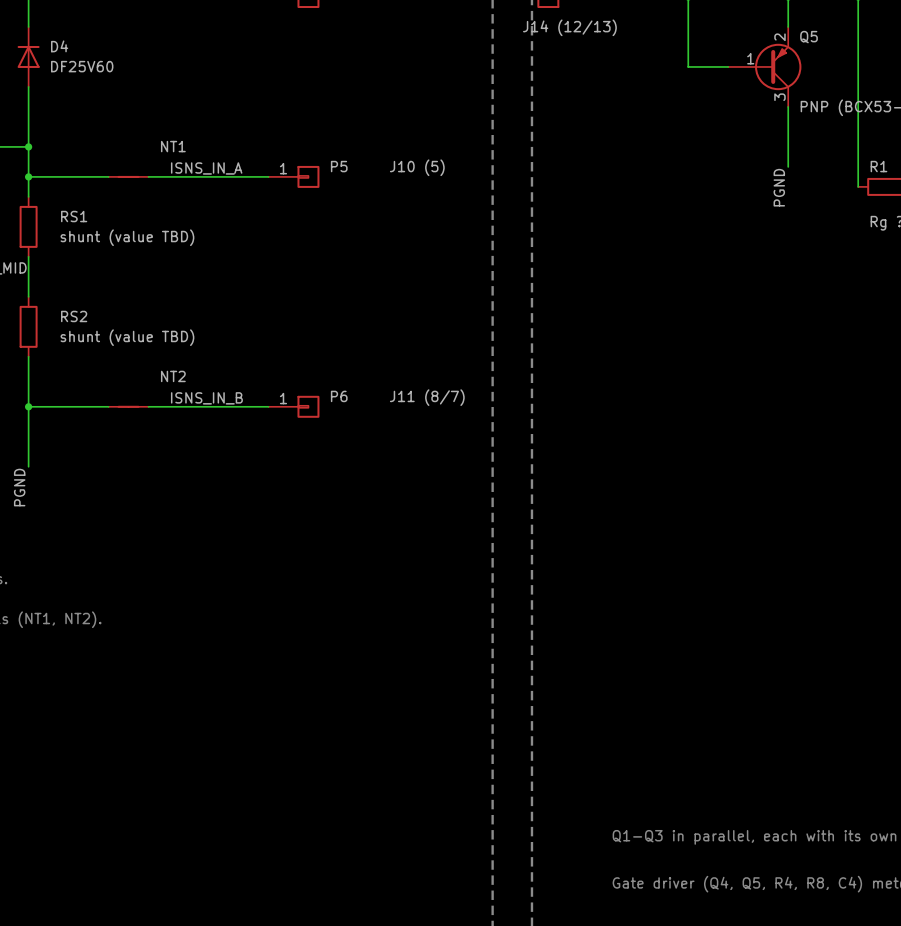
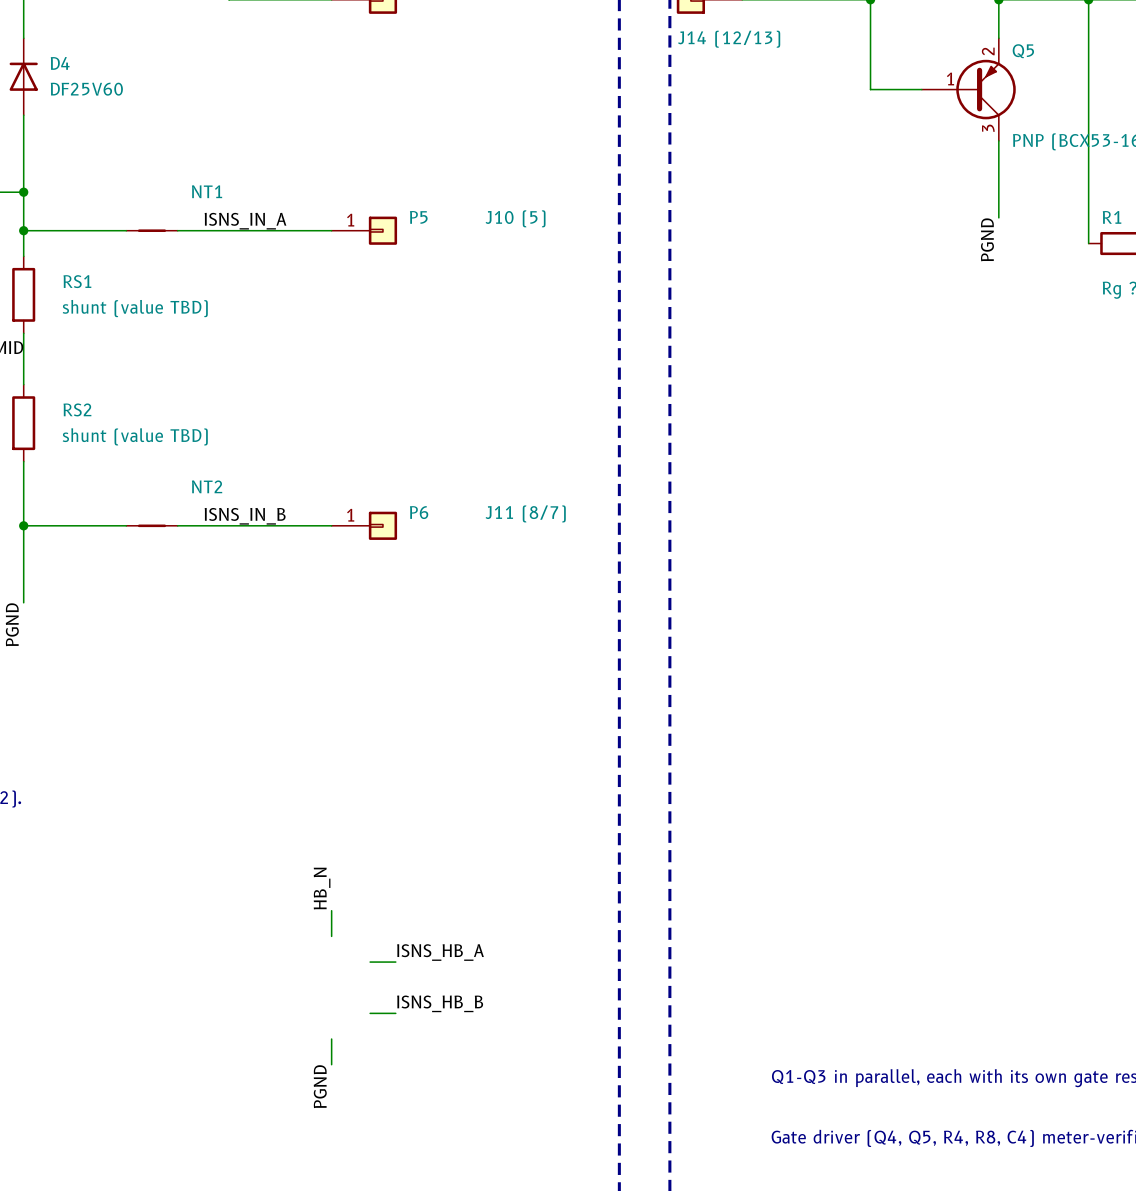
label: none -> HB_N (322, 888)
wire: none -> (331, 910) (331, 936)
label: none -> ISNS_HB_A (440, 952)
wire: none -> (370, 962) (395, 962)
label: none -> ISNS_HB_B (440, 1003)
wire: none -> (370, 1013) (395, 1013)
wire: none -> (331, 1039) (331, 1064)
label: none -> PGND (320, 1086)

